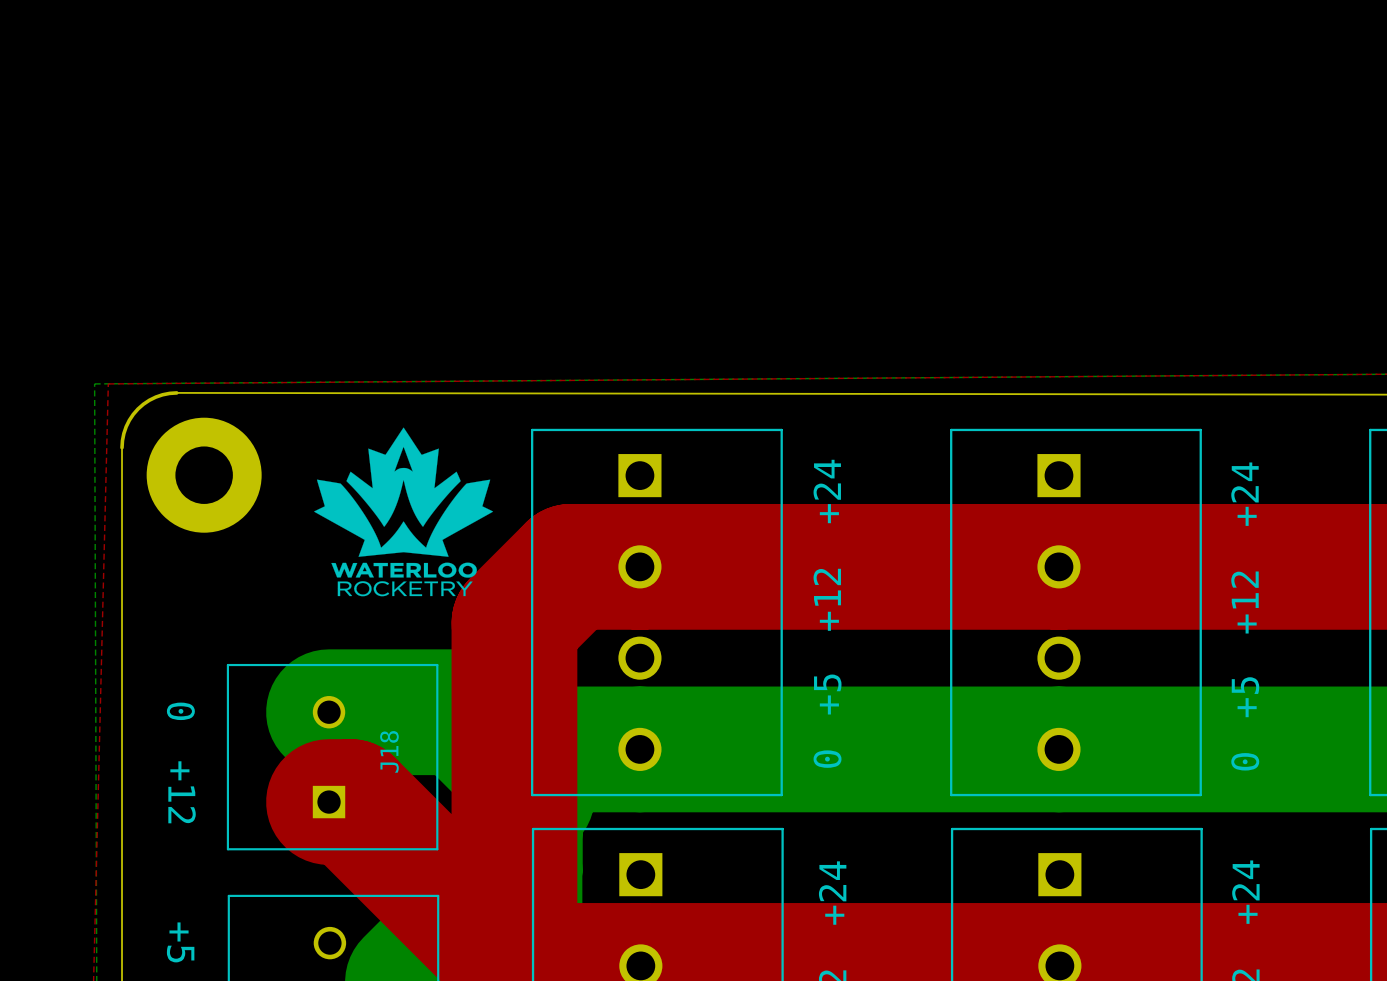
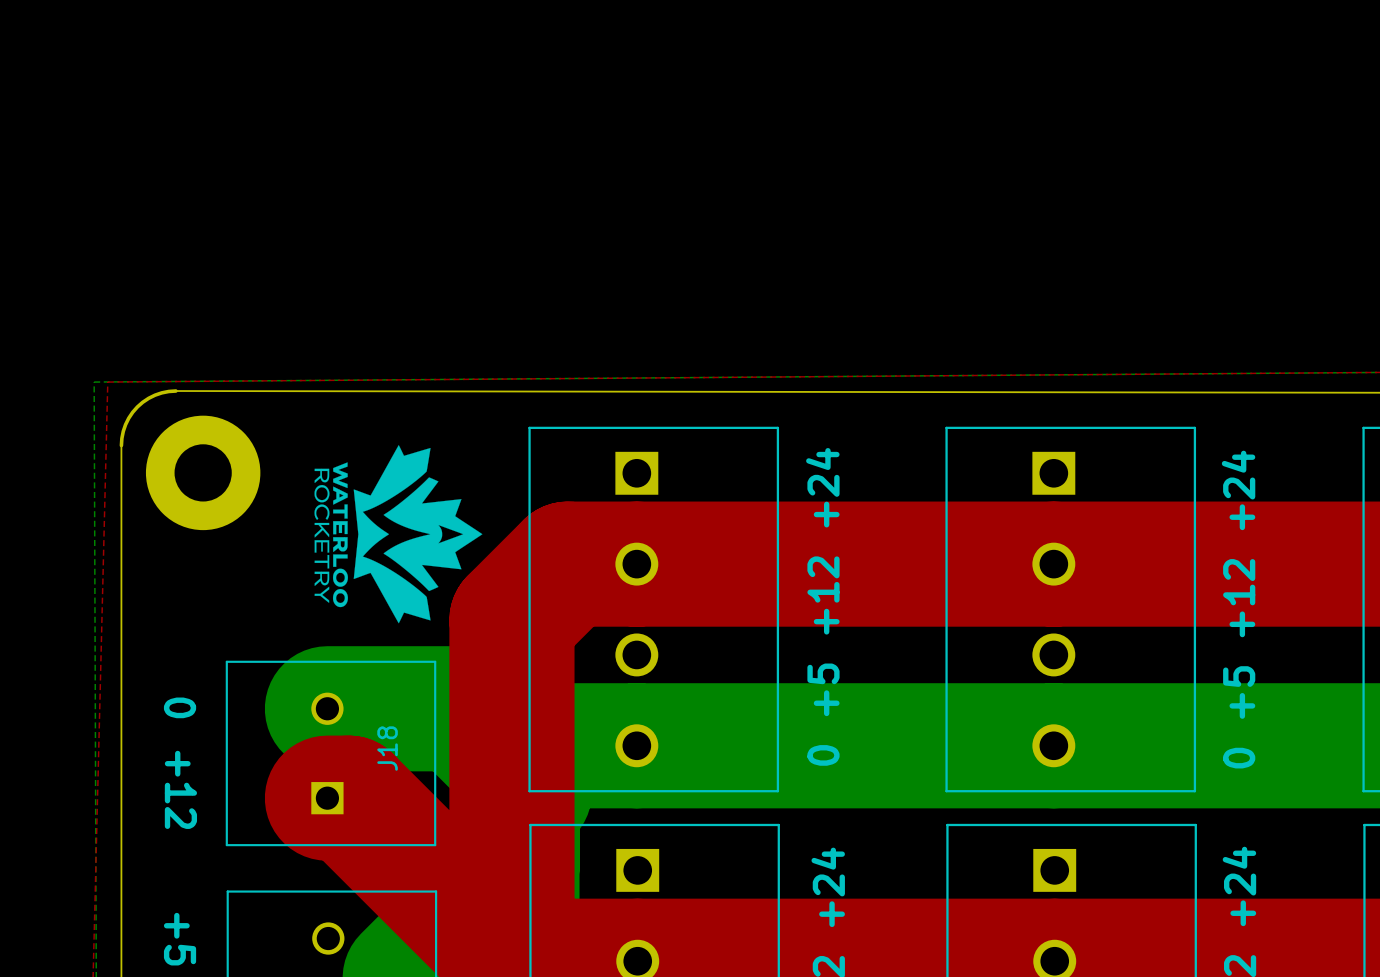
drawing: [314, 427, 494, 597] -> none
drawing: none -> [314, 445, 483, 624]

